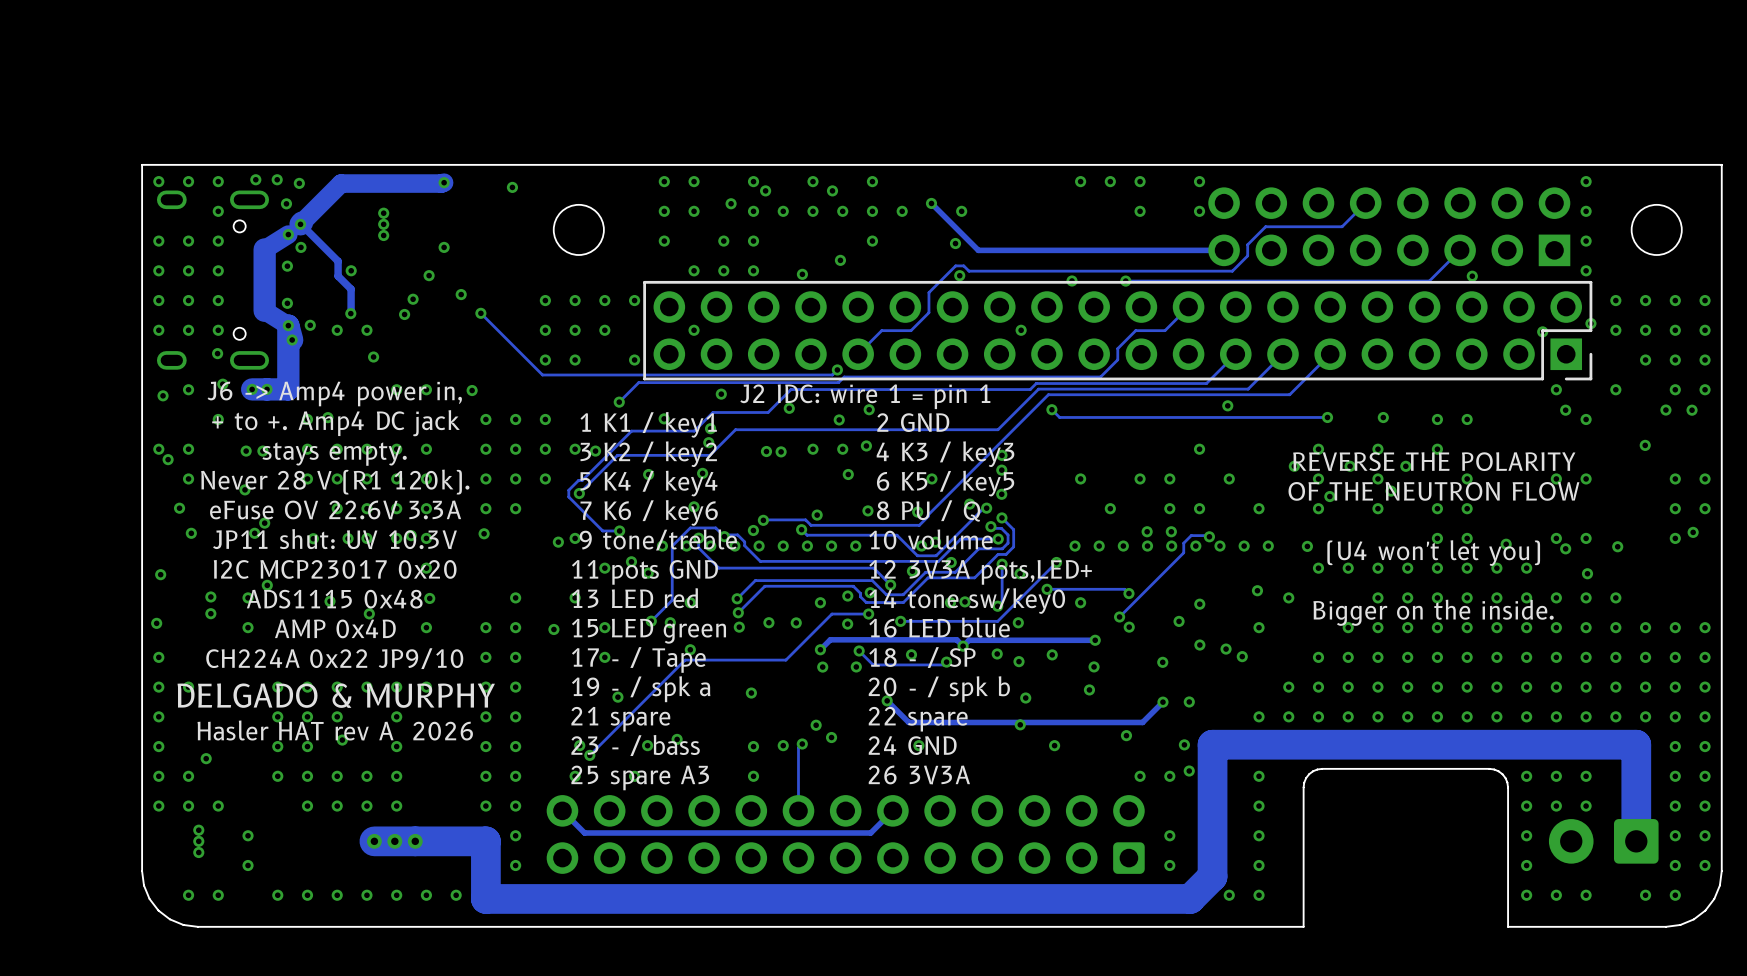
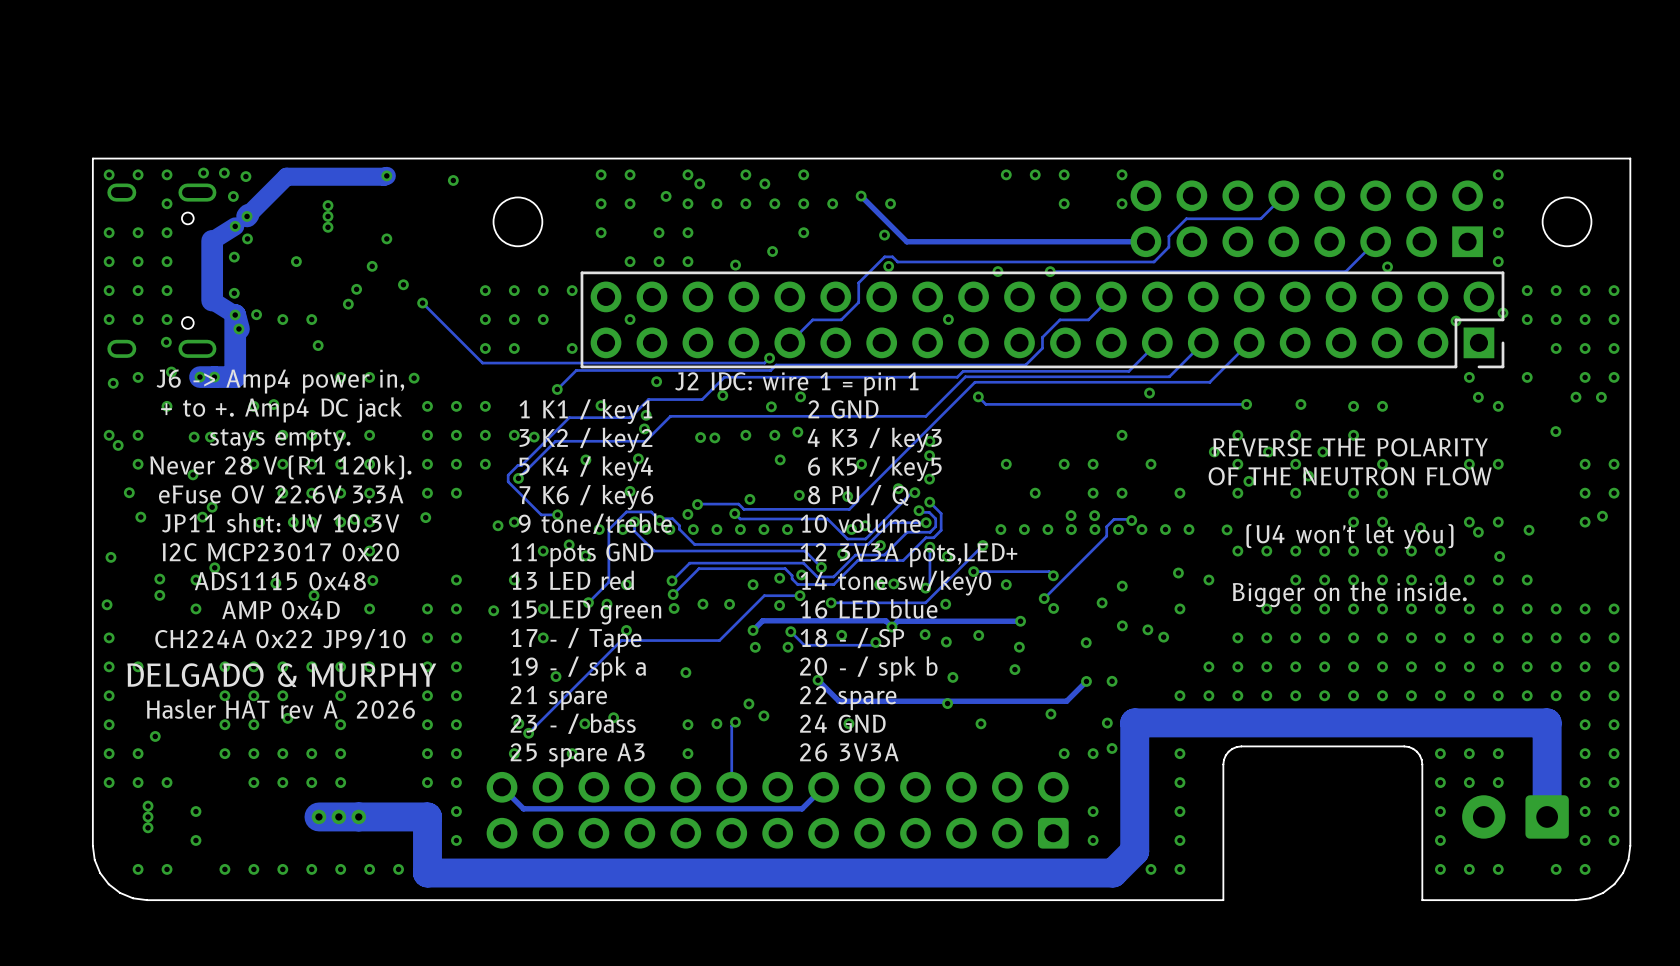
track: (300, 224) (338, 261) (338, 276) (351, 289) (350, 313) -> none
via: (350, 313) -> none

